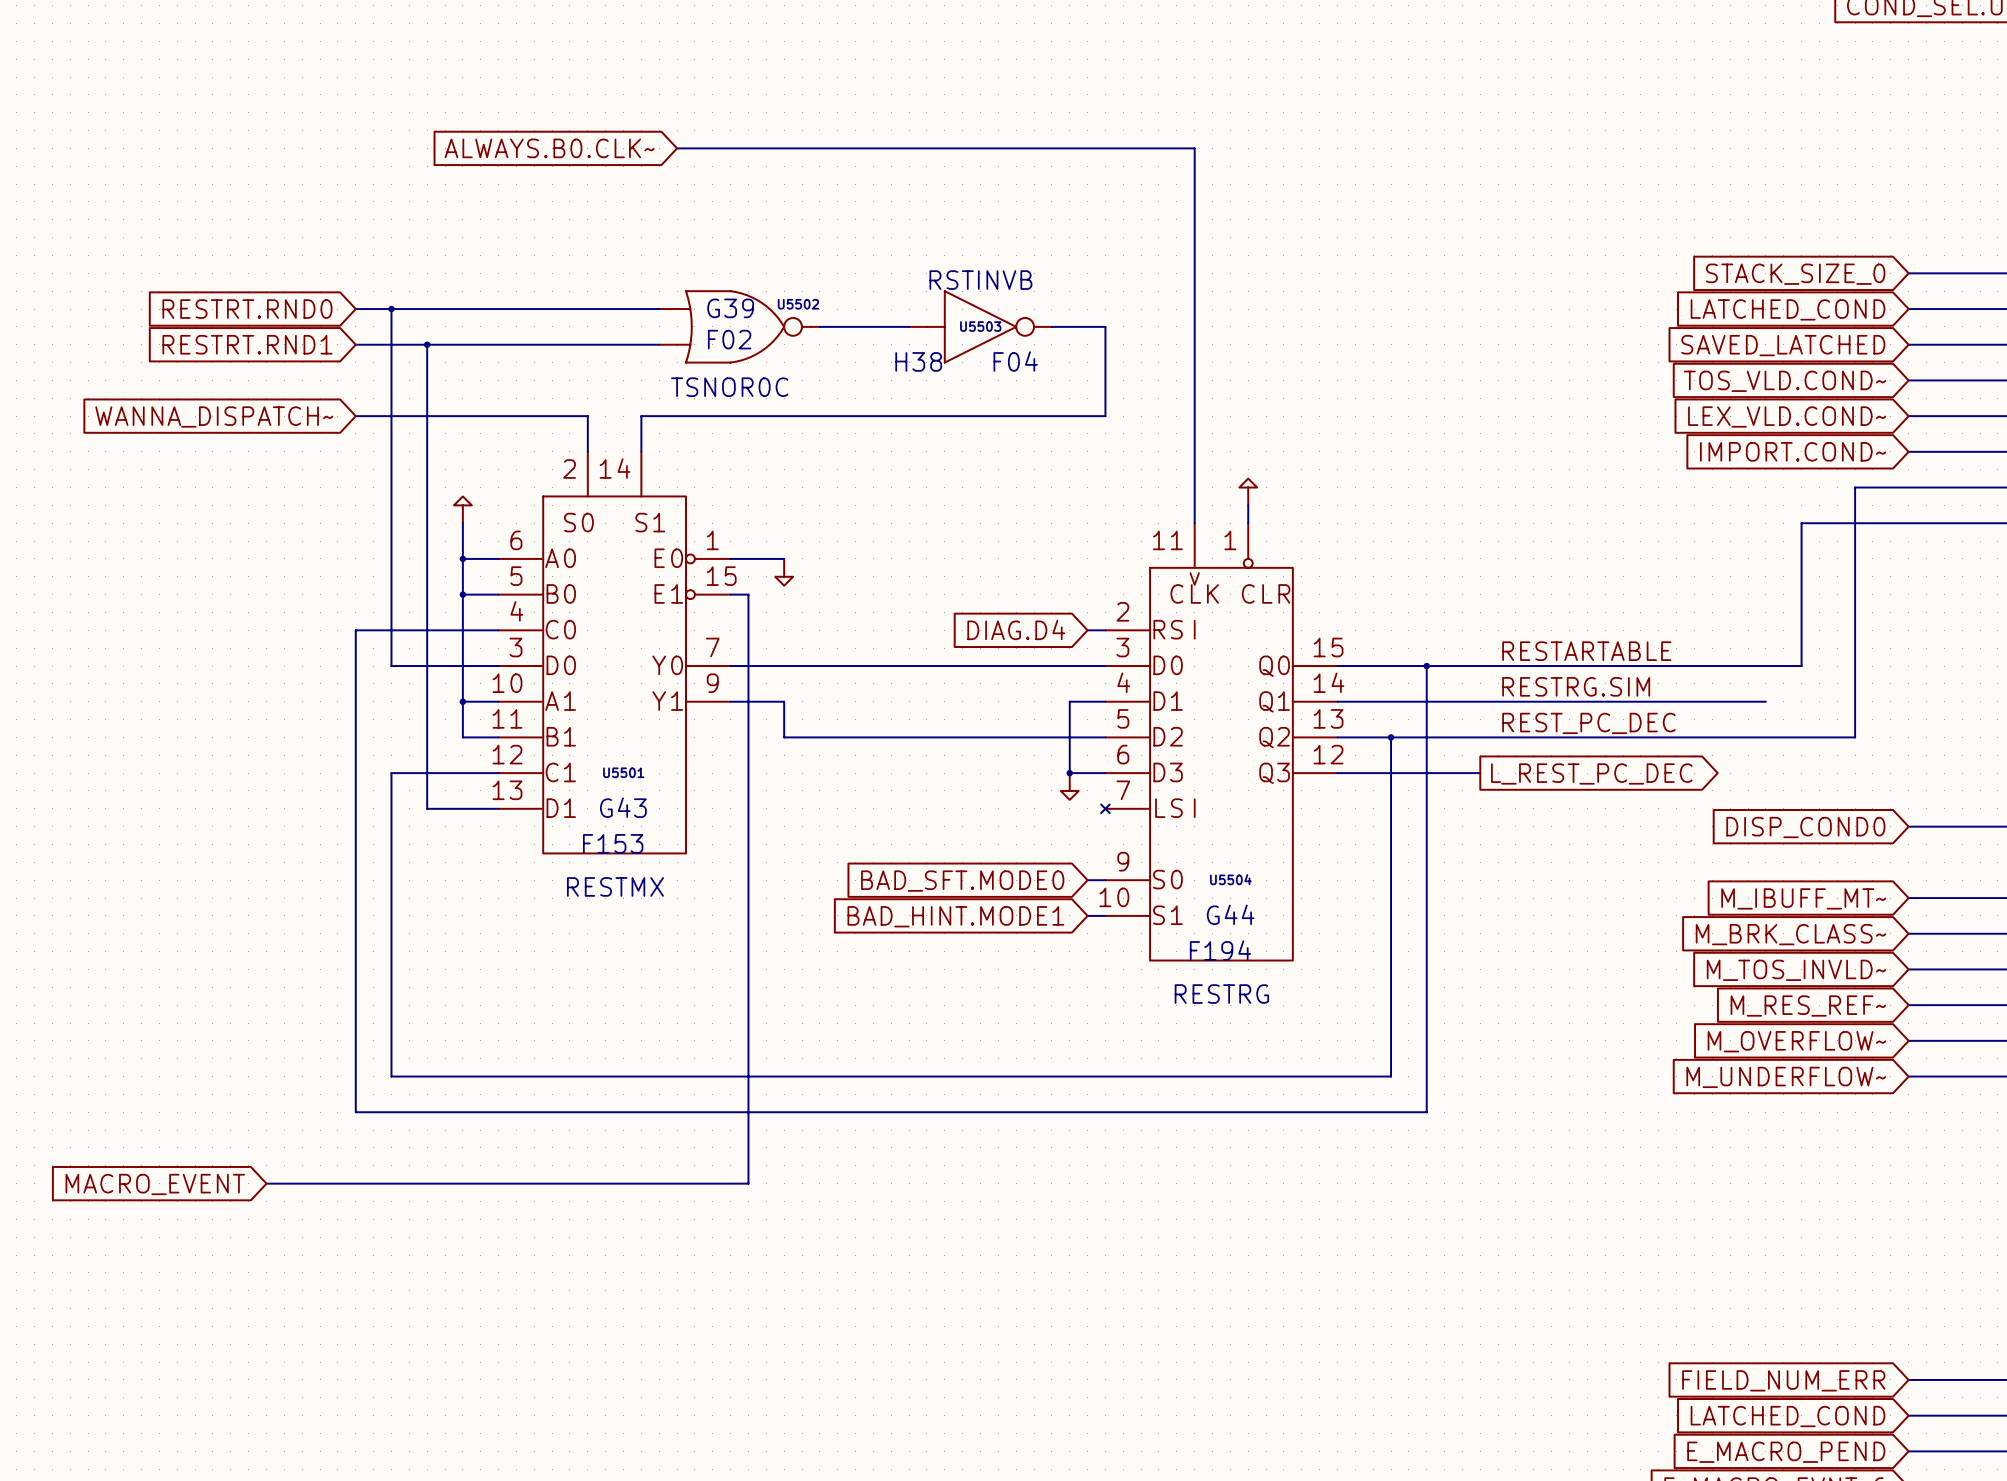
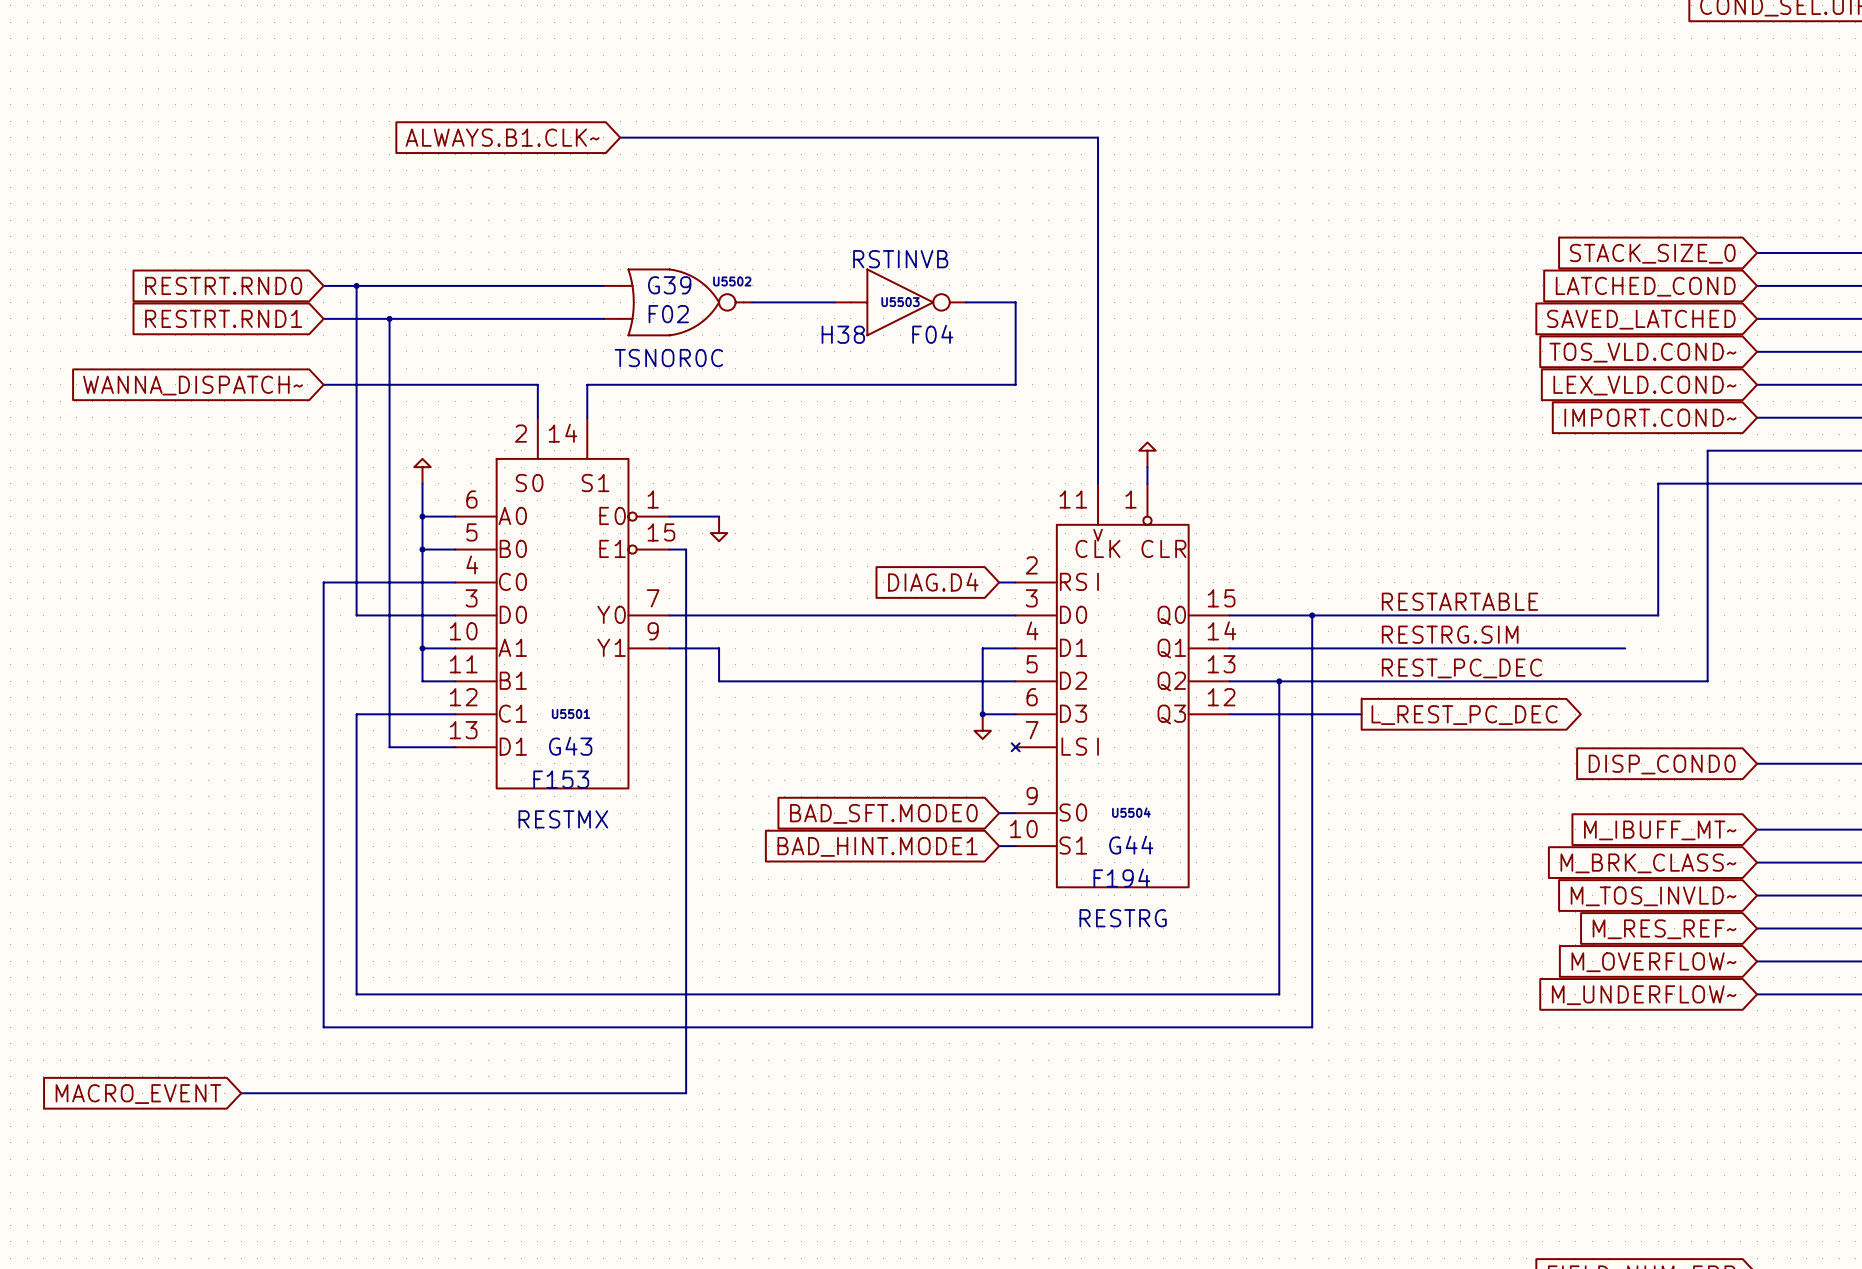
global label: ALWAYS.B0.CLK~ (549, 148) -> ALWAYS.B1.CLK~ (502, 137)

